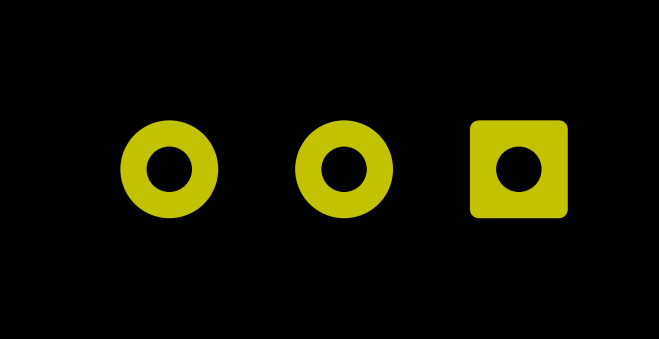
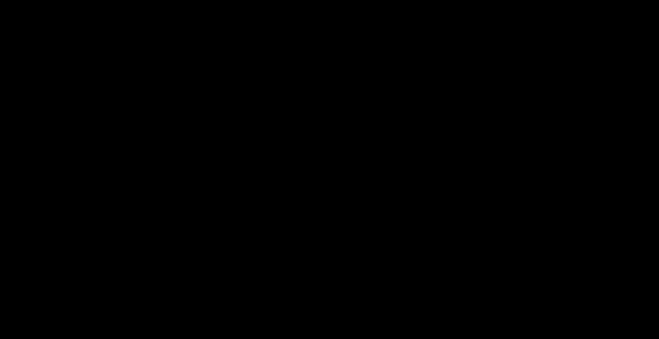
part: (344, 169) -> none

